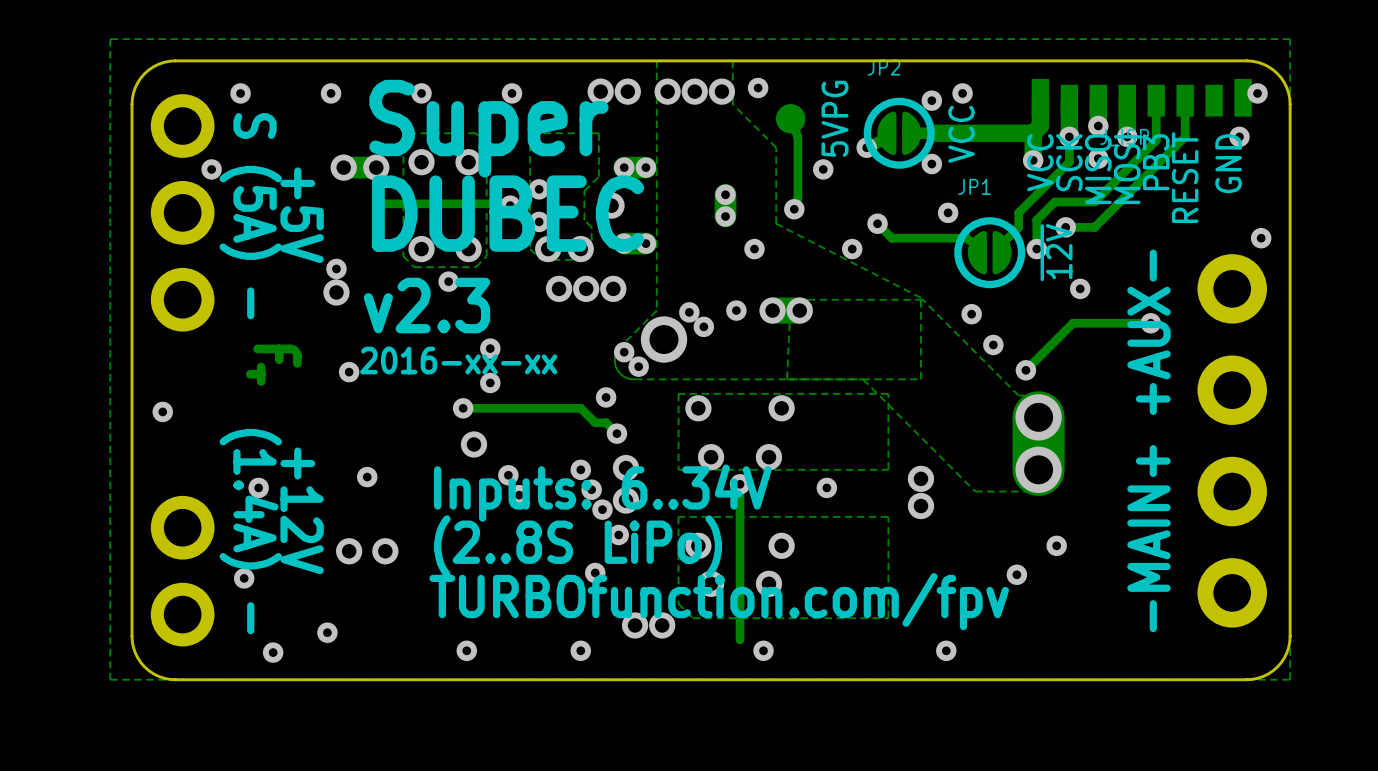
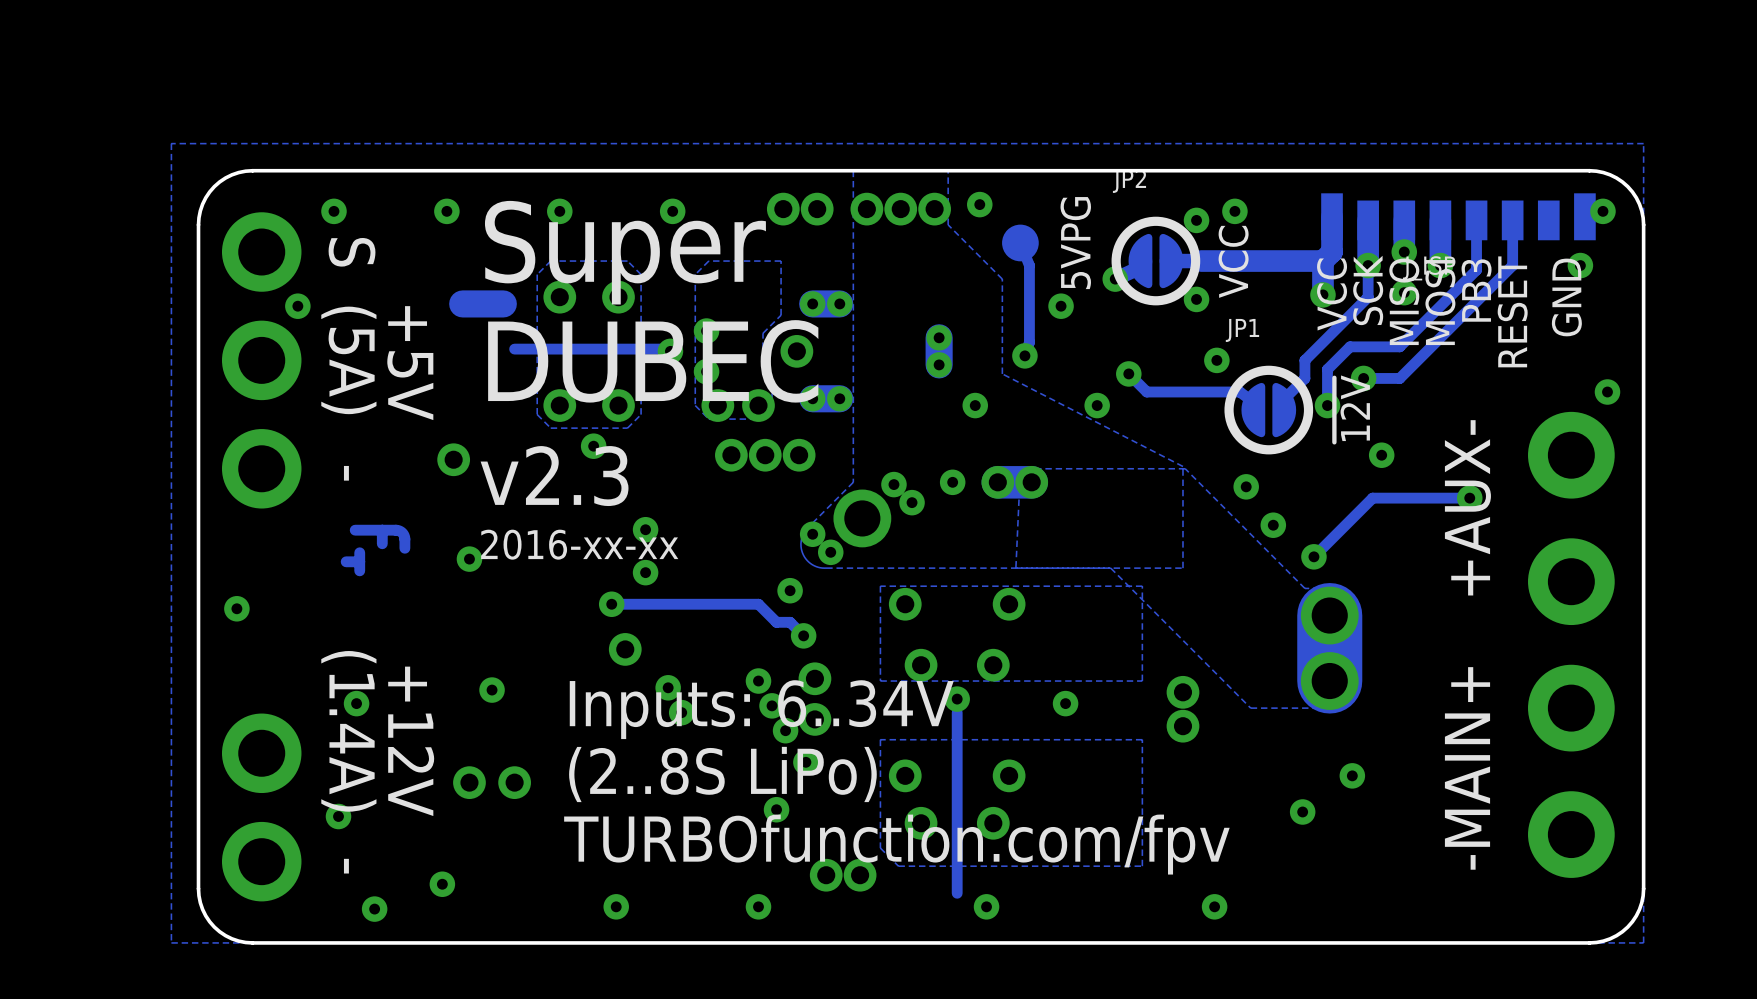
via: (343, 167) -> none
via: (376, 167) -> none
via: (336, 268) -> none

